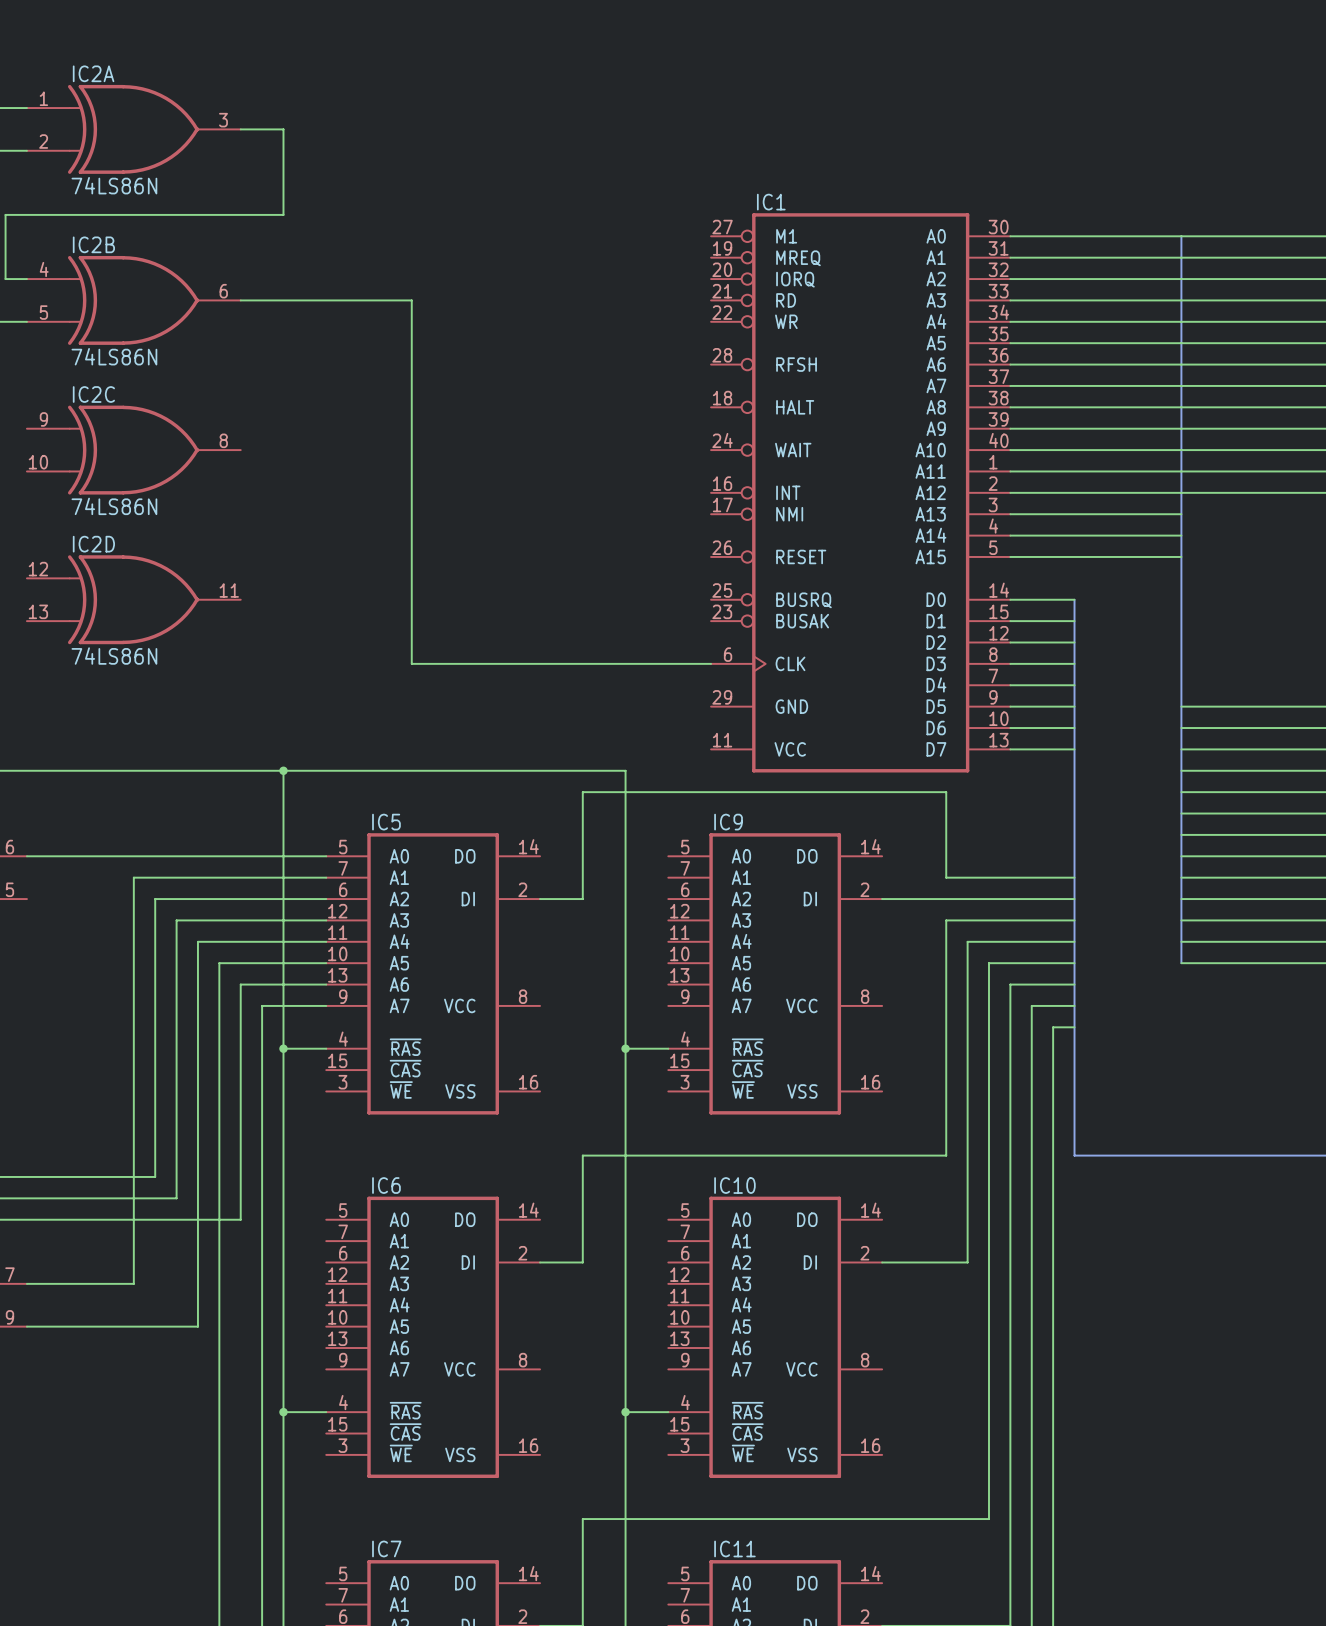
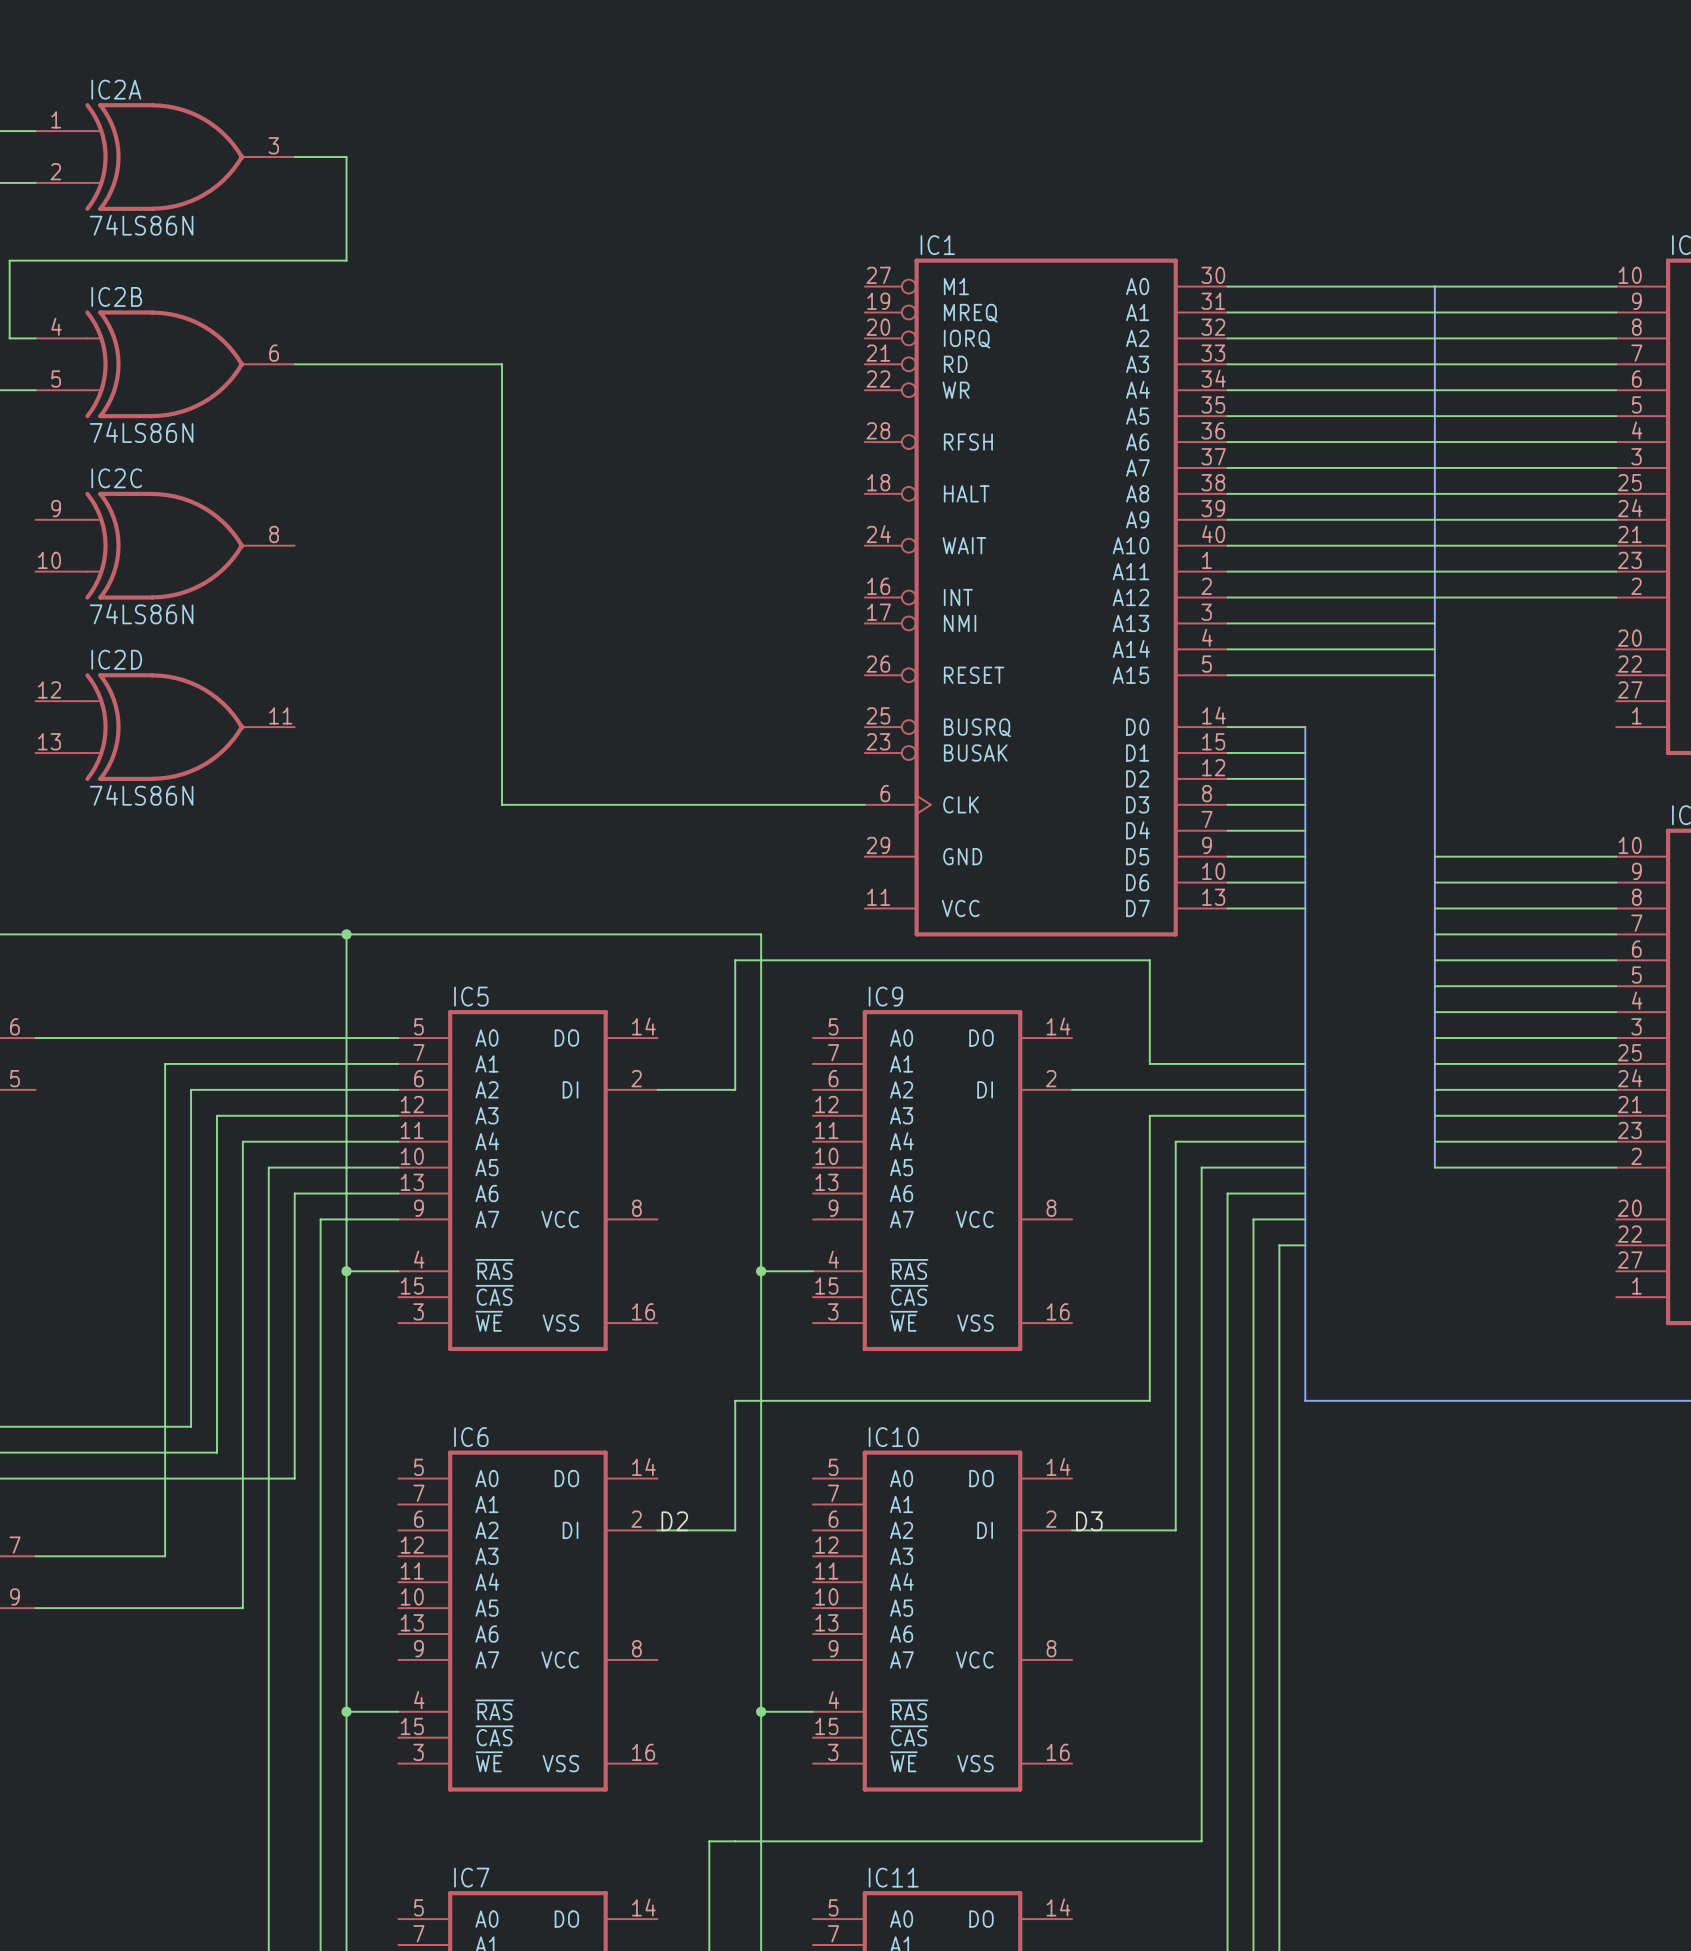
wire: (604, 792) (582, 792) (582, 899) -> (735, 960) (735, 1089) (709, 1089)
wire: (604, 1155) (582, 1155) (582, 1262) -> (735, 1400) (735, 1530) (709, 1530)
label: none -> D2 (674, 1521)
label: none -> D3 (1089, 1521)

